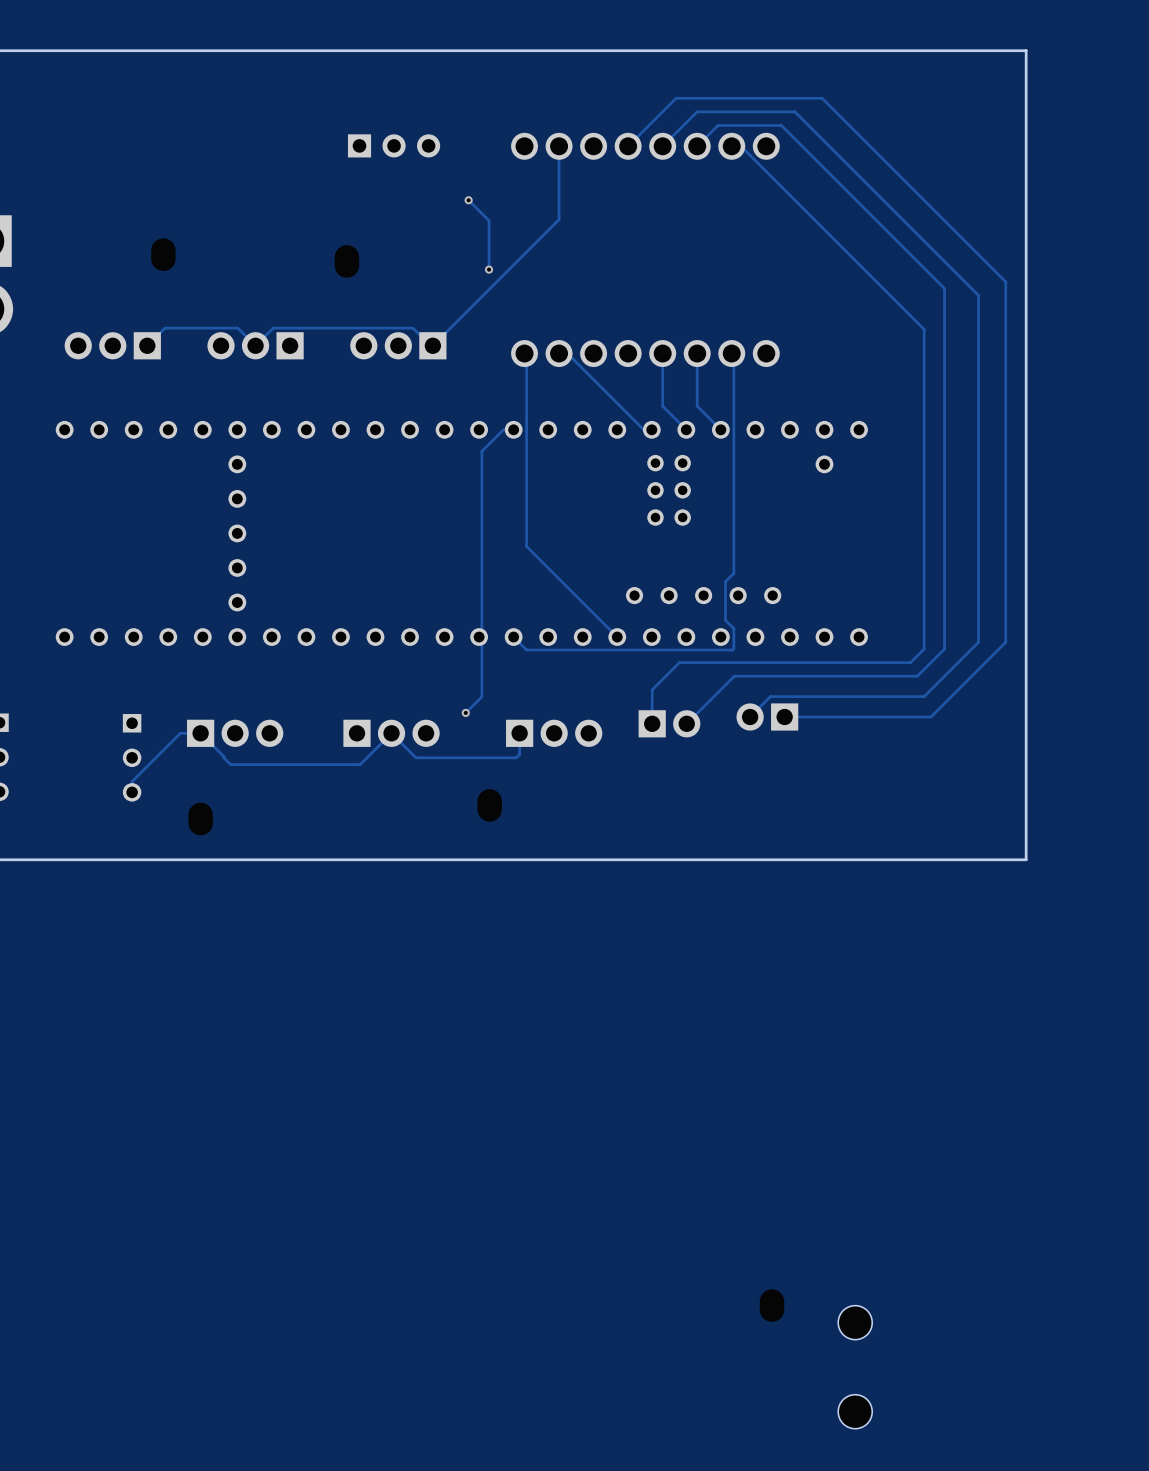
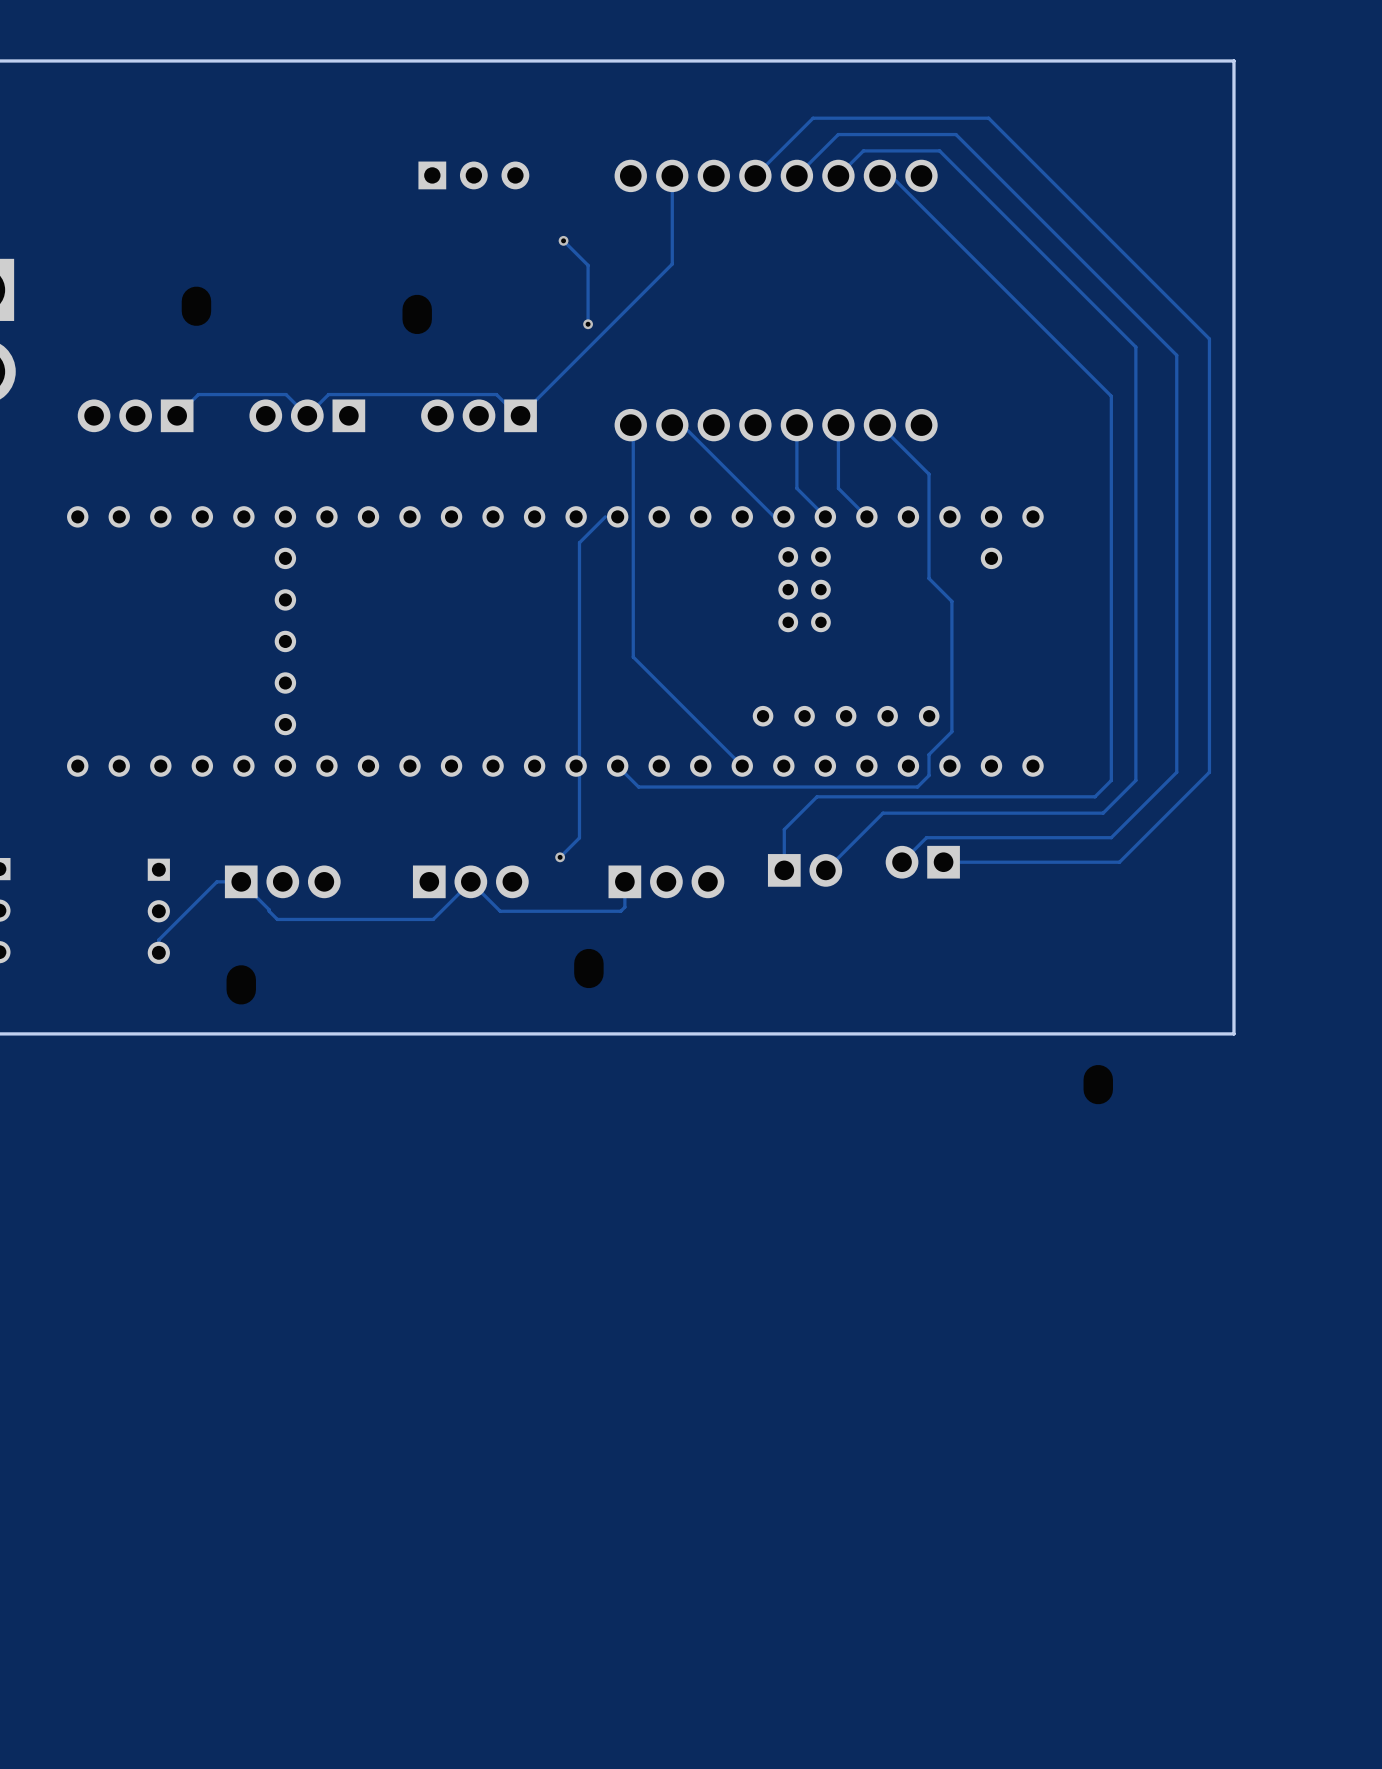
track: (733, 355) (733, 573) (725, 581) (725, 620) (733, 628) (733, 648) (526, 650) -> (882, 427) (929, 474) (929, 578) (951, 601) (951, 731) (929, 754) (929, 775) (917, 787) (638, 787) (633, 781)
part: none -> (1098, 1084)
part: (772, 1305) -> none
part: (855, 1322) -> none
part: (855, 1411) -> none

